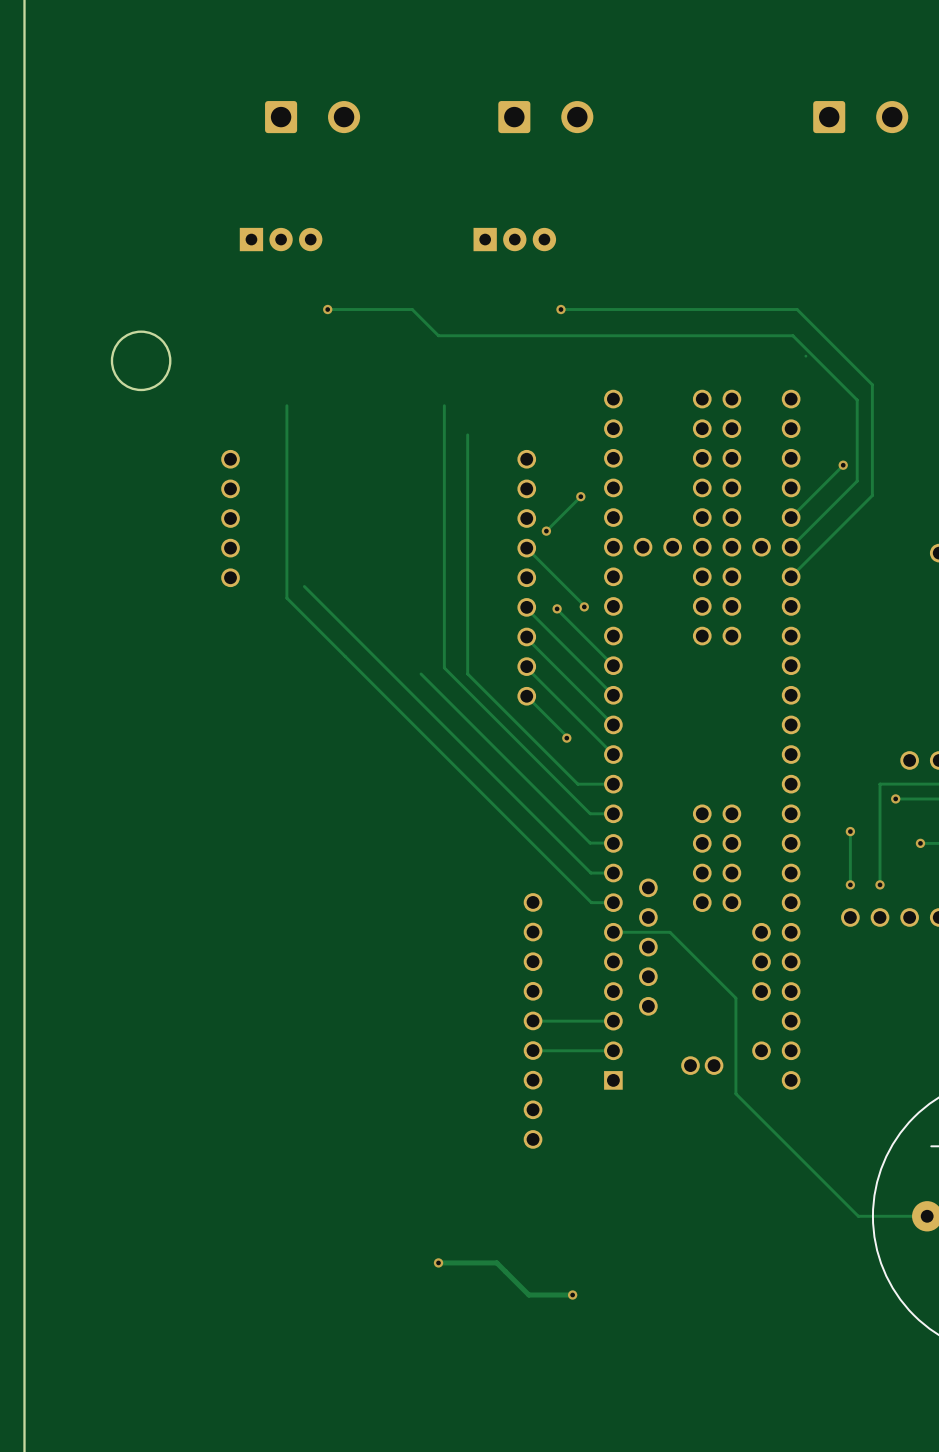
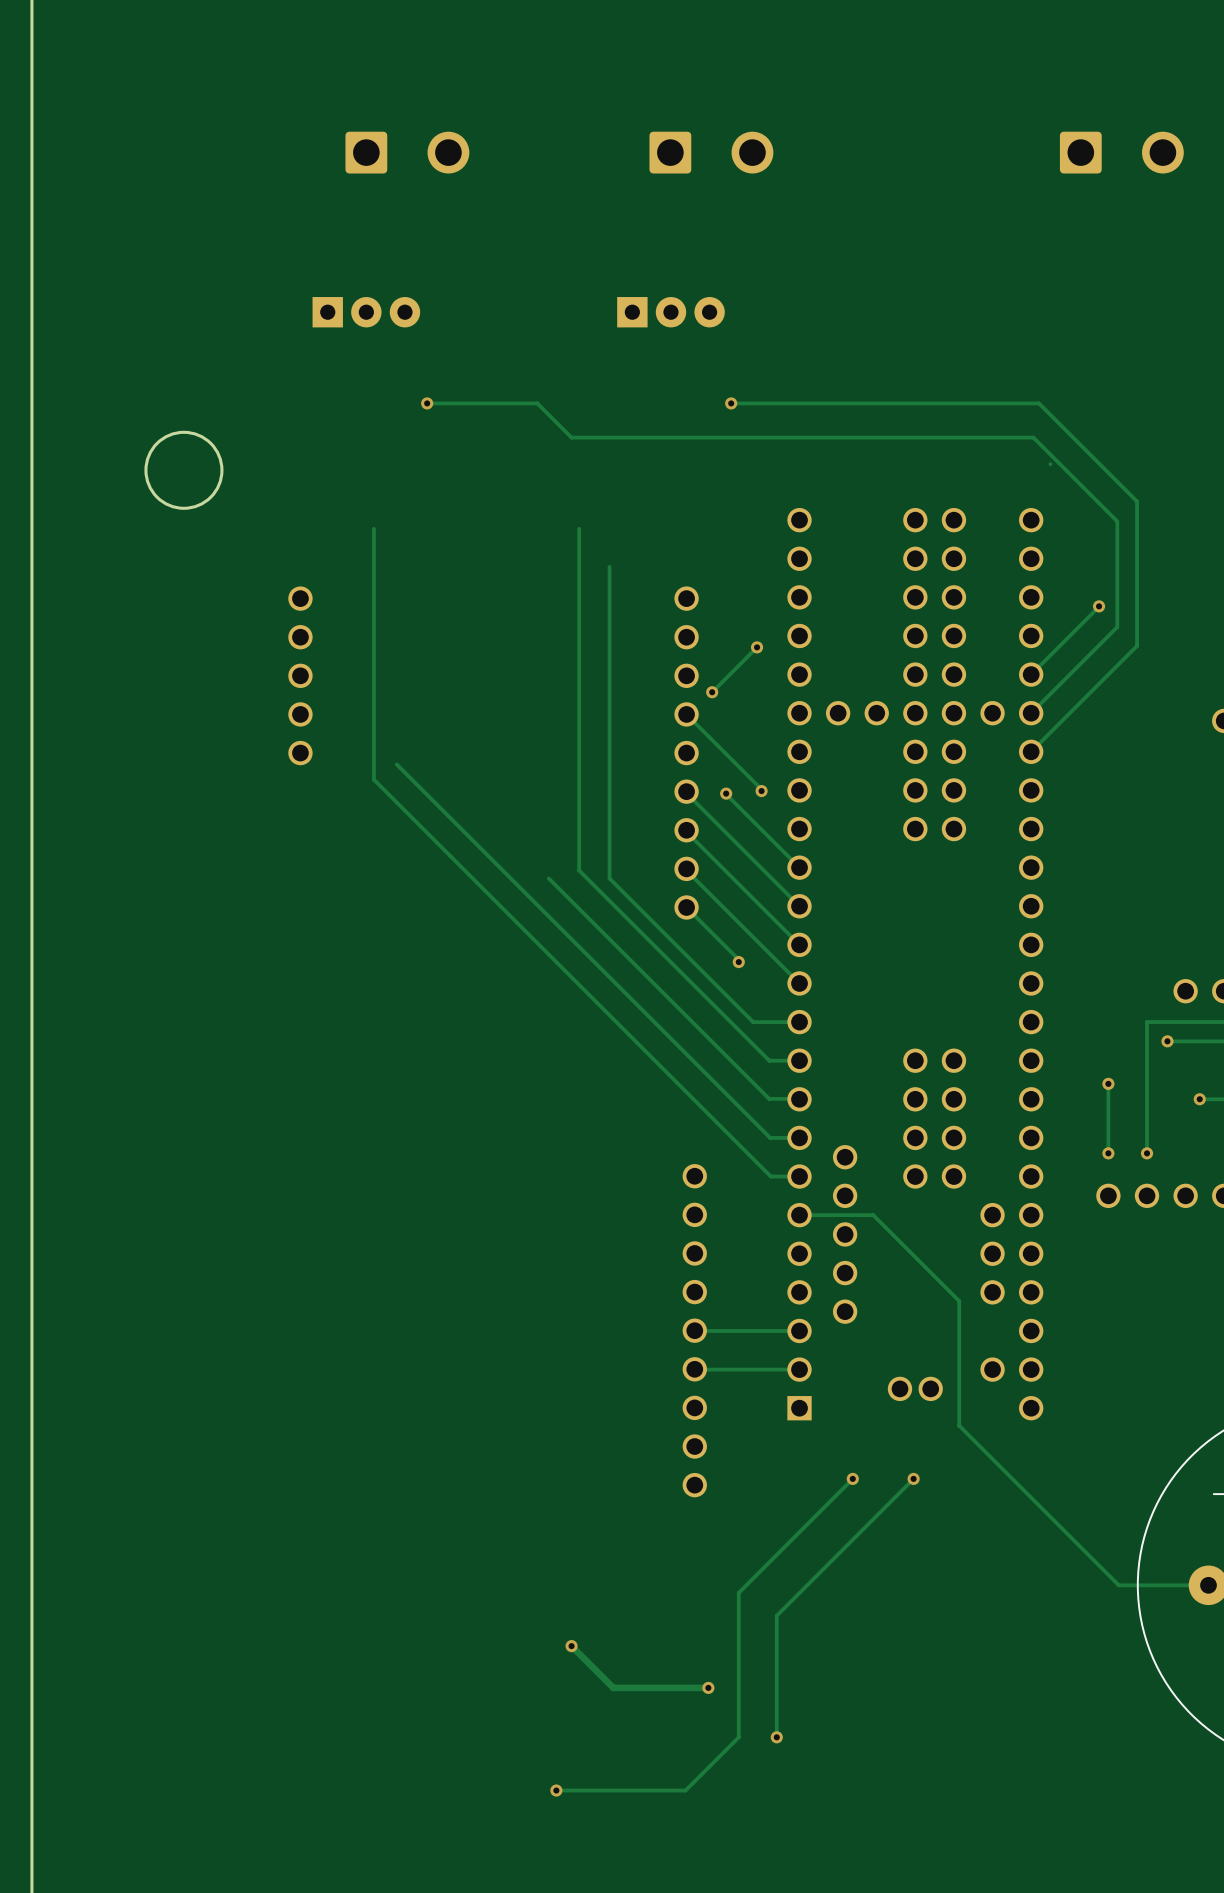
track: none -> (852, 1478) (738, 1592) (738, 1737) (685, 1790) (556, 1790)
via: none -> (852, 1478)
track: none -> (913, 1478) (776, 1615) (776, 1737)
via: none -> (913, 1478)
track: (438, 1262) (496, 1262) (528, 1295) -> (571, 1646) (613, 1687) (689, 1687)
via: none -> (708, 1687)
track: (572, 1295) (543, 1295) -> none
via: (572, 1295) -> none
via: none -> (776, 1737)
via: none -> (556, 1790)

